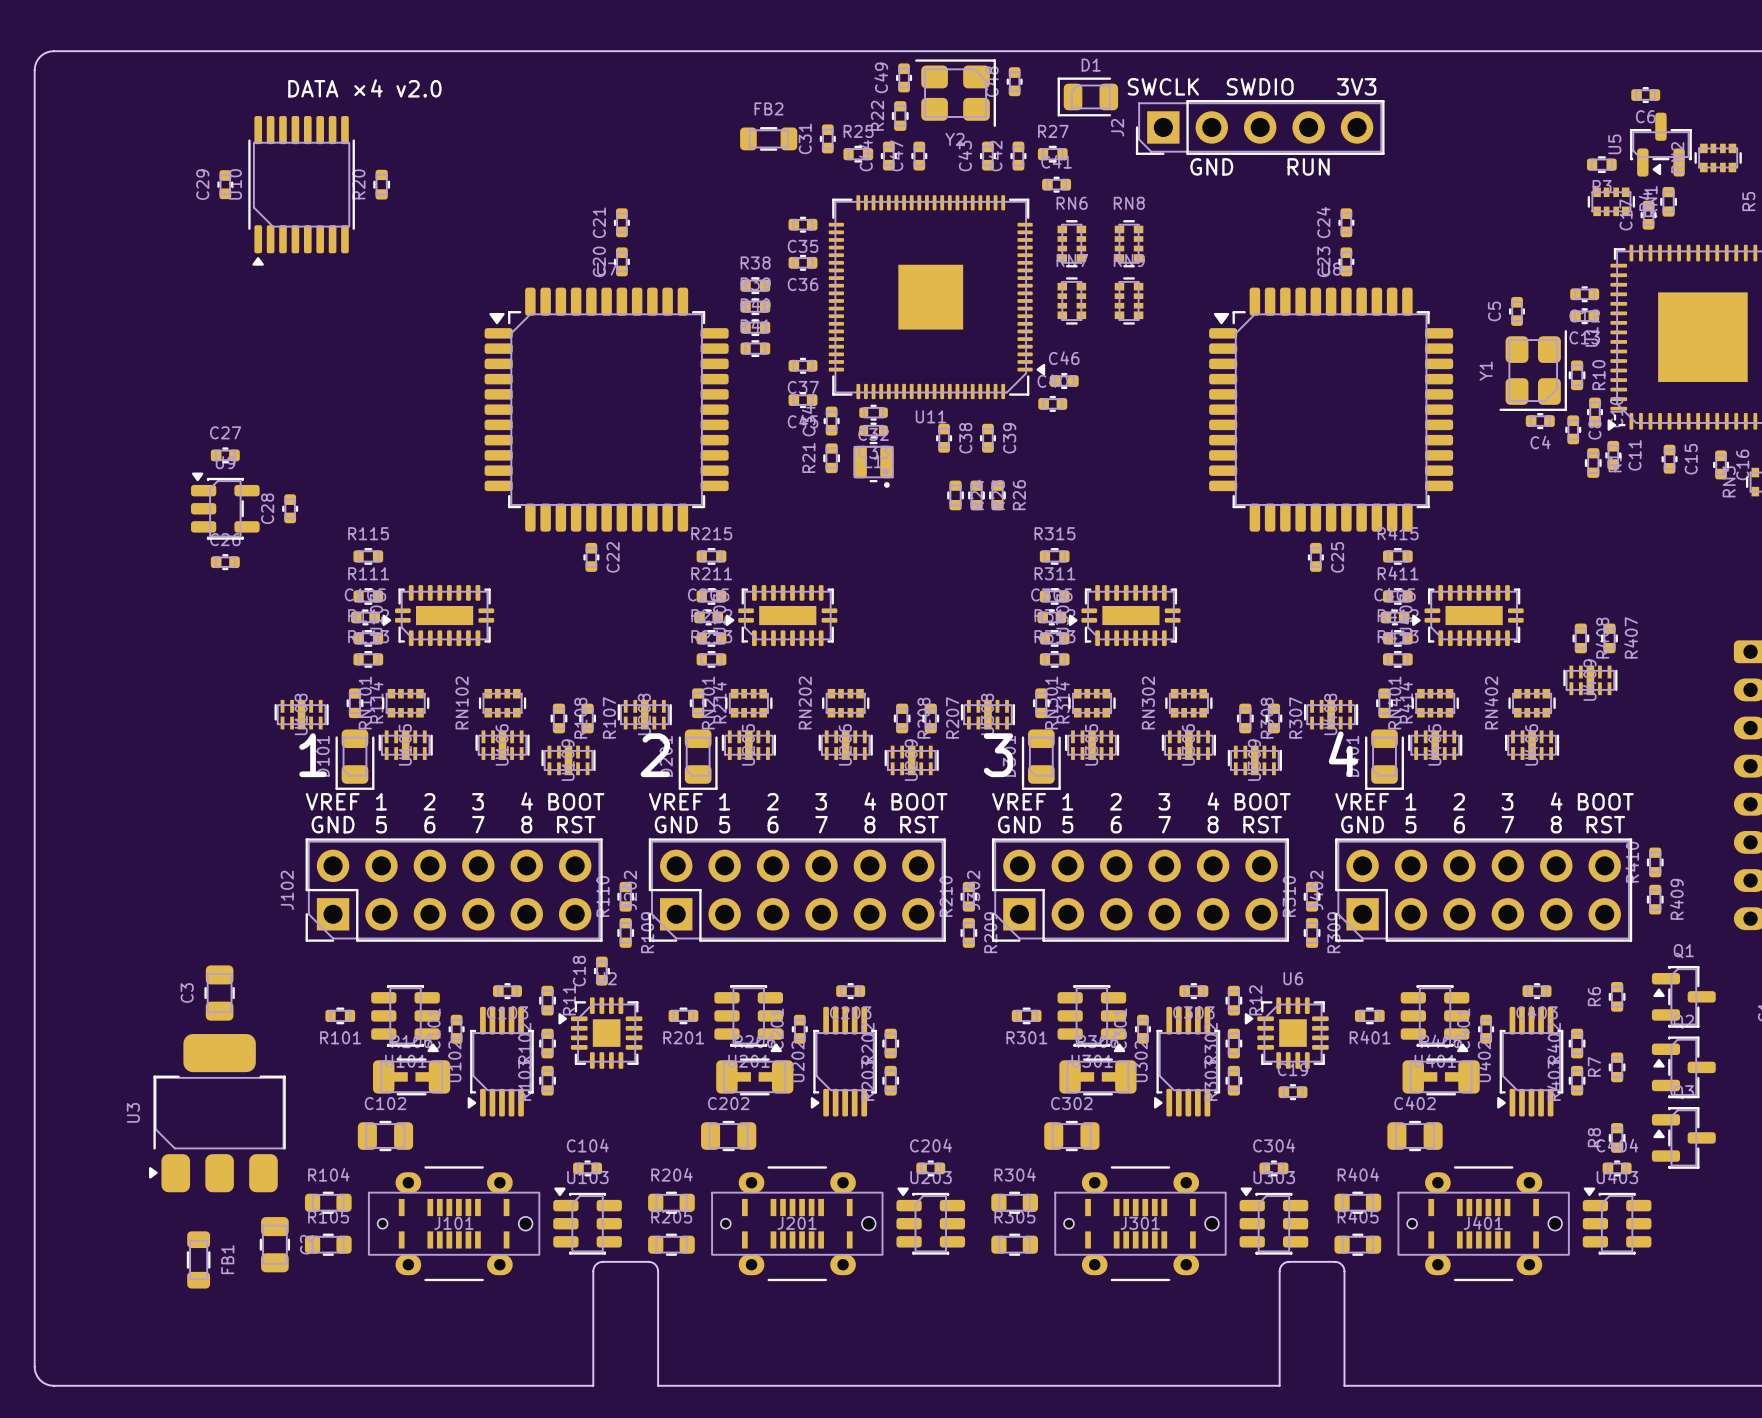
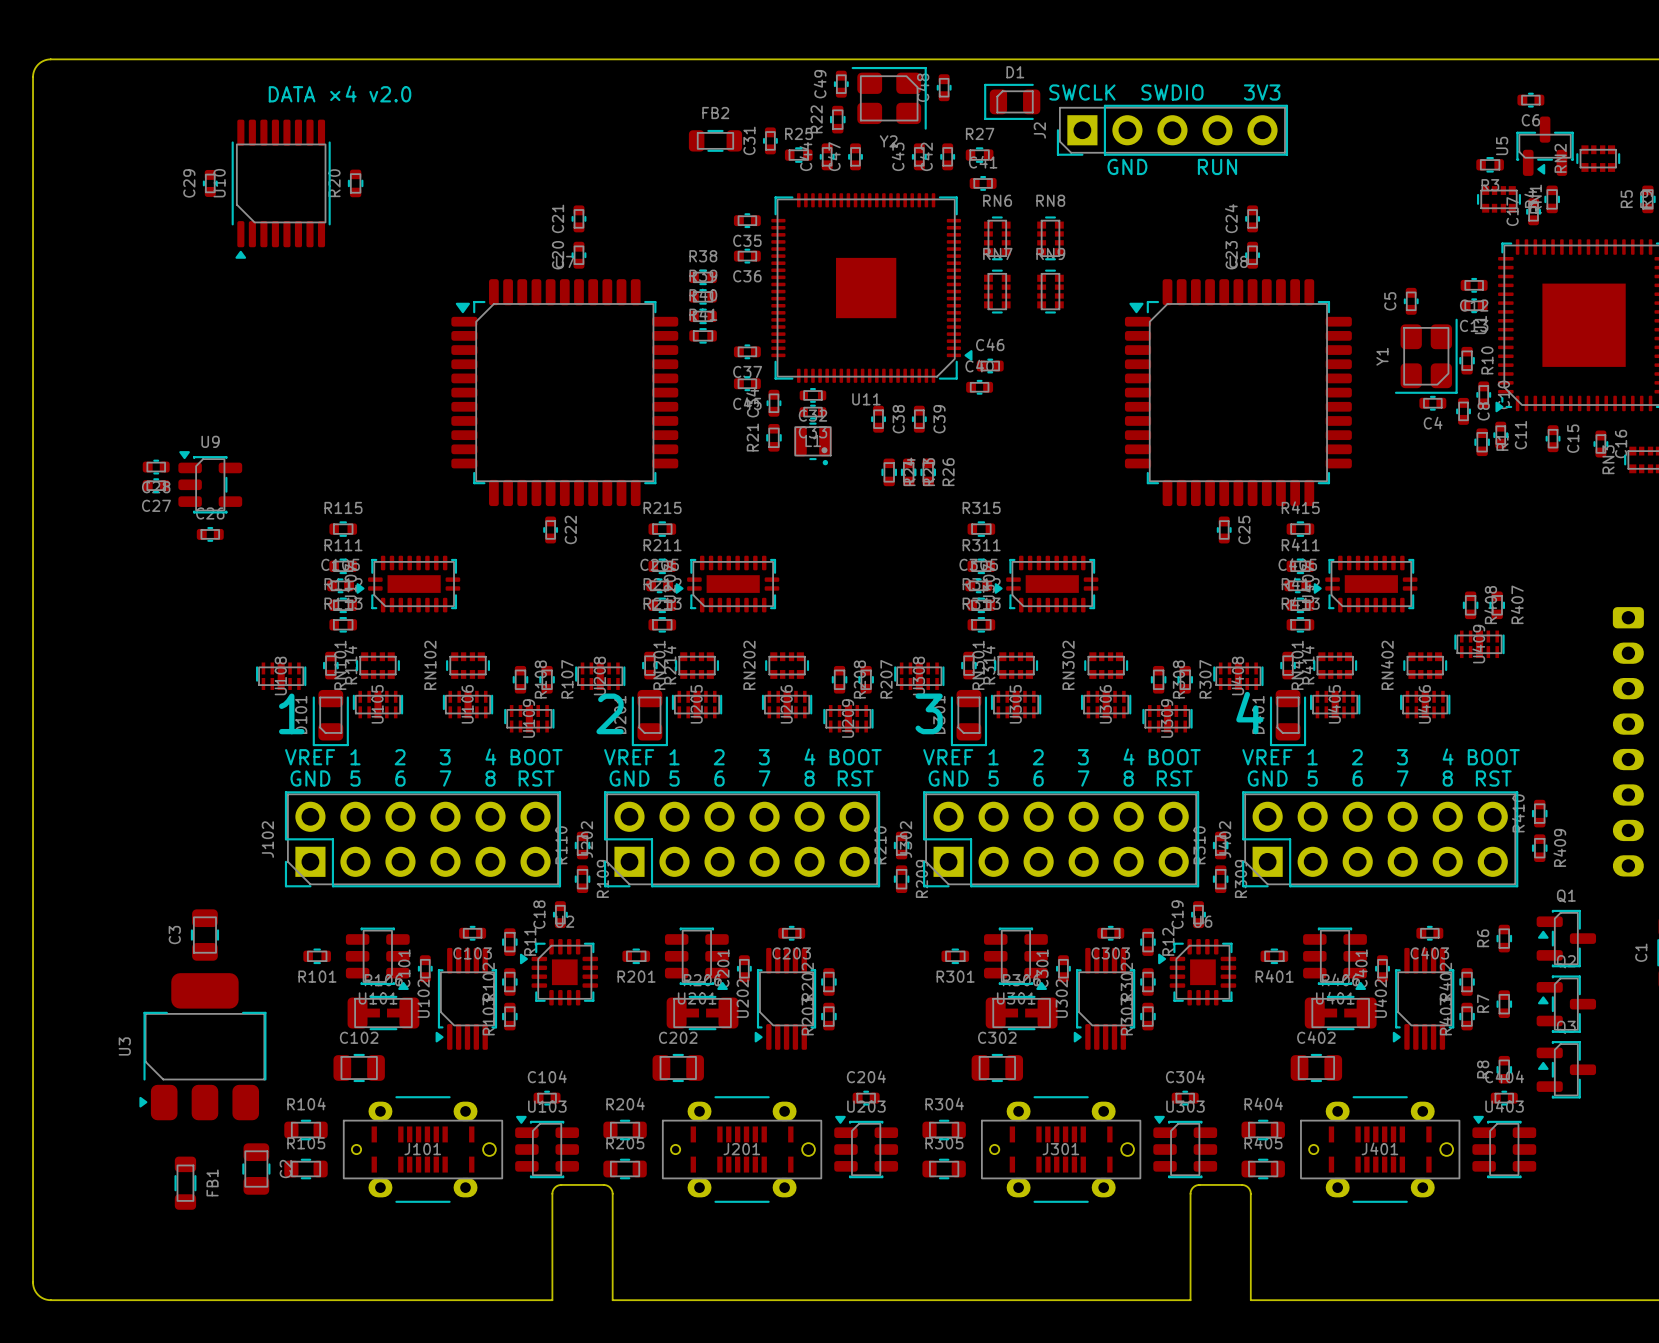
C27 name position: C27 (225, 432) -> C27 (156, 505)
C27 position: (225, 455) -> (156, 485)
C28 rotation: 0° (290, 508) -> 90° clockwise (156, 467)
C28 position: (290, 508) -> (156, 467)
C19 rotation: 0° (1292, 1092) -> 90° clockwise (1198, 914)
C19 position: (1292, 1092) -> (1198, 914)

